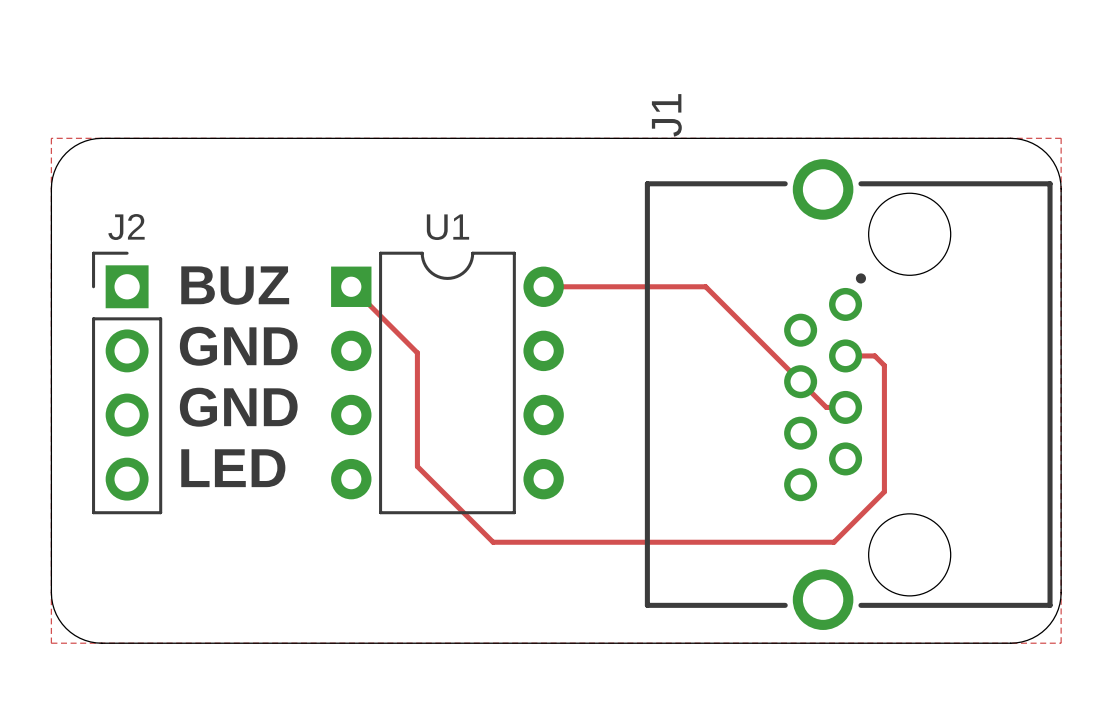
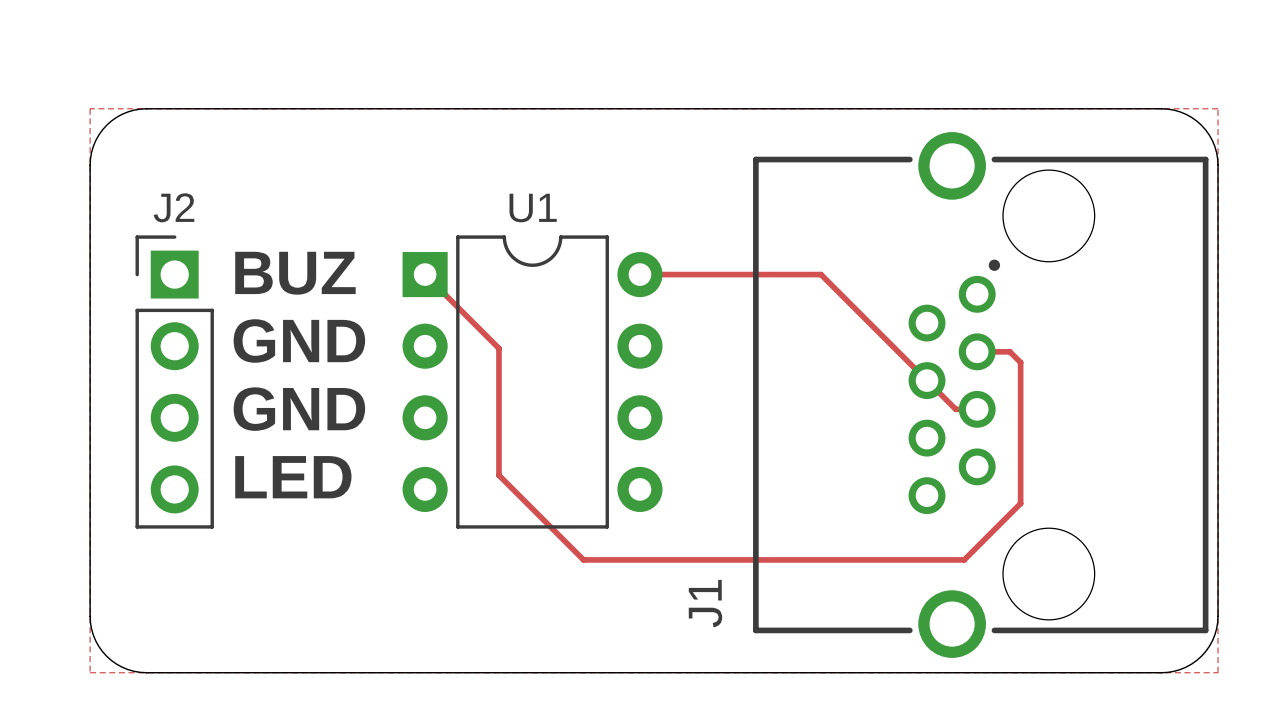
J1 name position: J1 (666, 115) -> J1 (705, 603)

